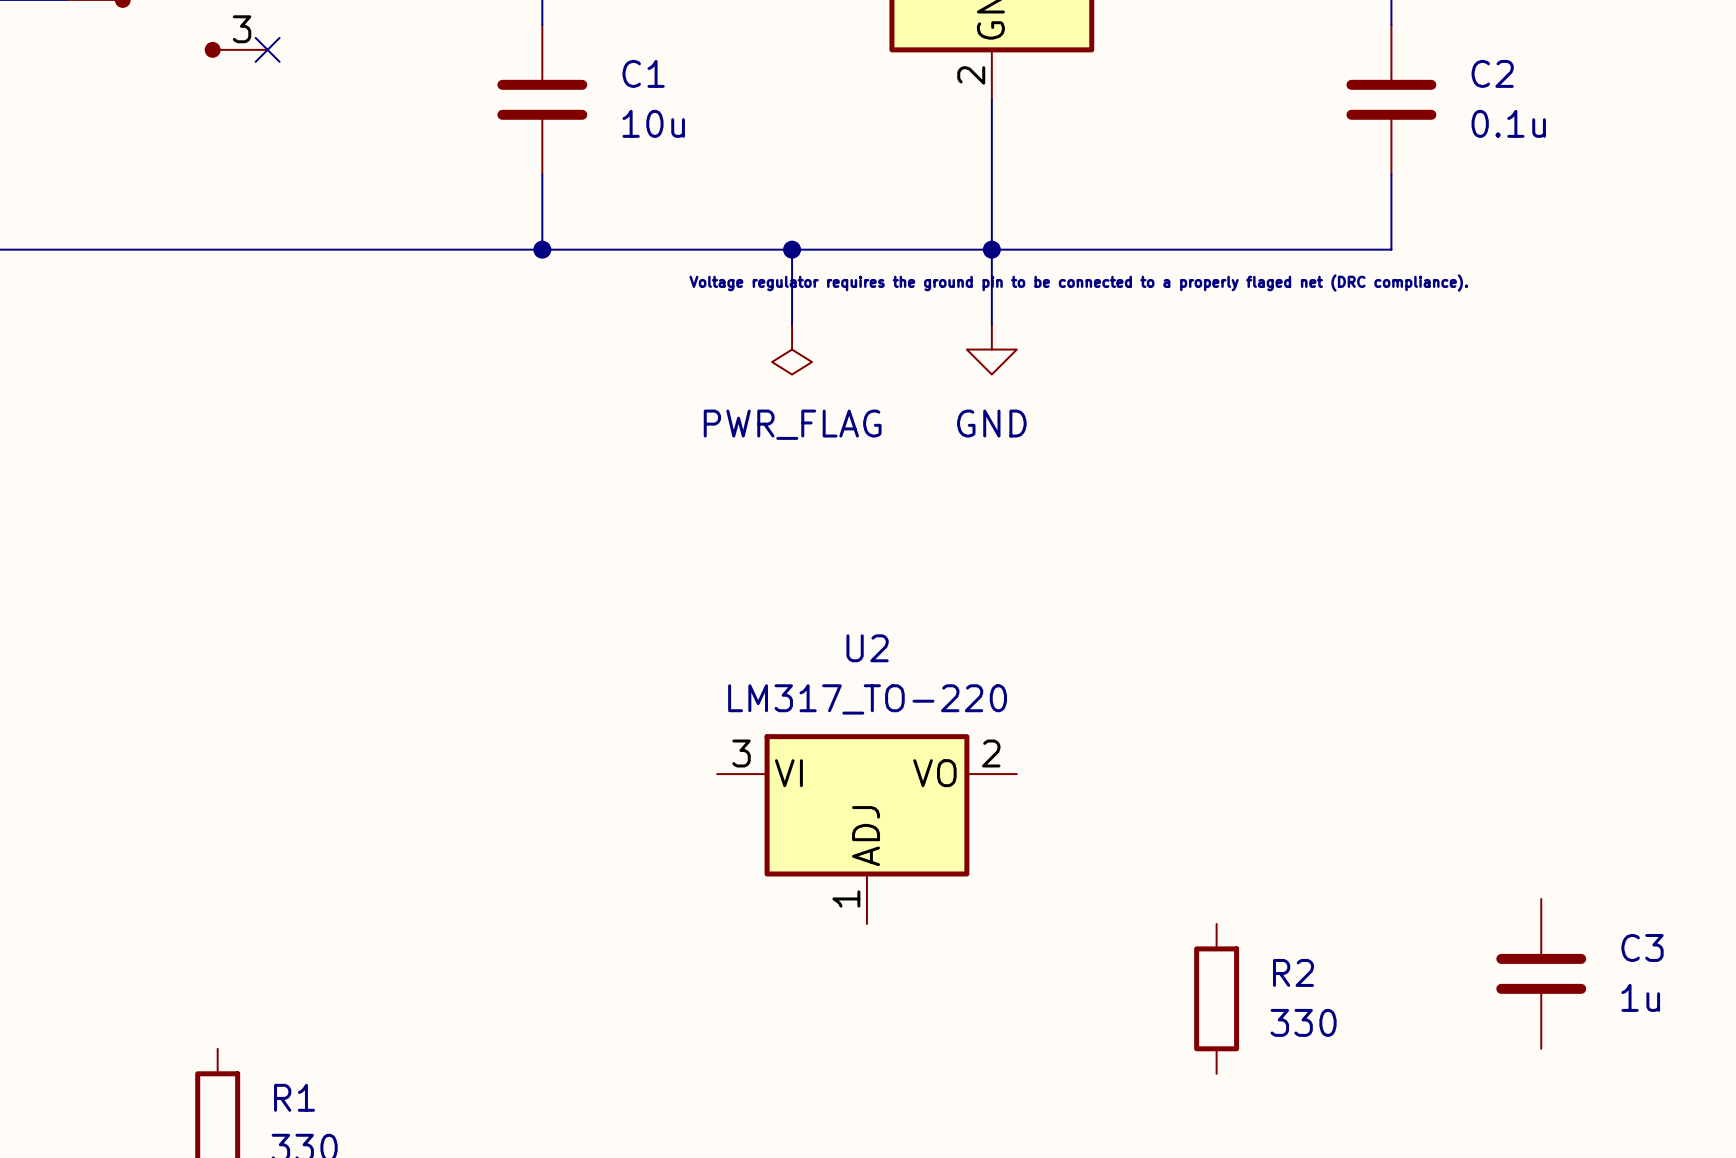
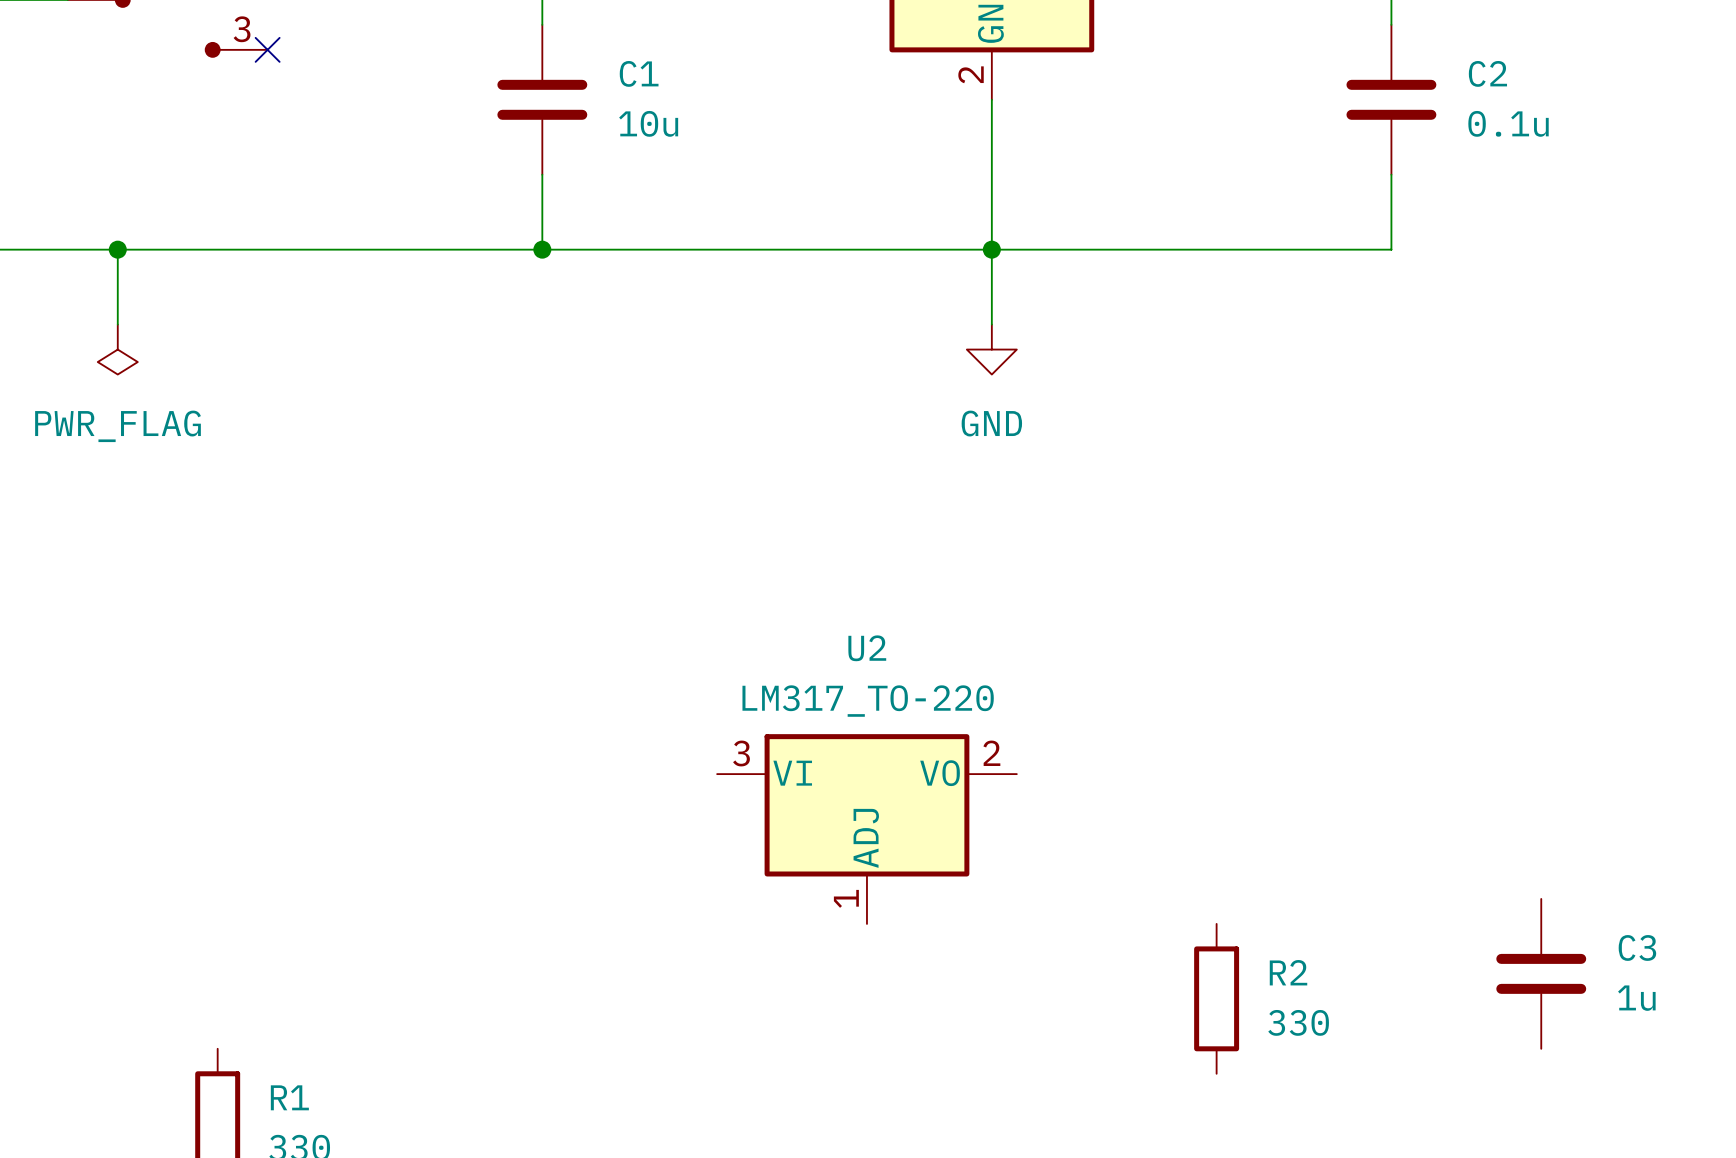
wire: none -> (117, 249) (117, 324)
junction: none -> (117, 249)
wire: (792, 249) (792, 324) -> none
junction: (792, 249) -> none
text: Voltage regulator requires the ground pin to be connected to a properly flaged net (DRC compliance). (1078, 283) -> none
power symbol: none -> PWR_FLAG (117, 349)
power symbol: PWR_FLAG (792, 349) -> none

